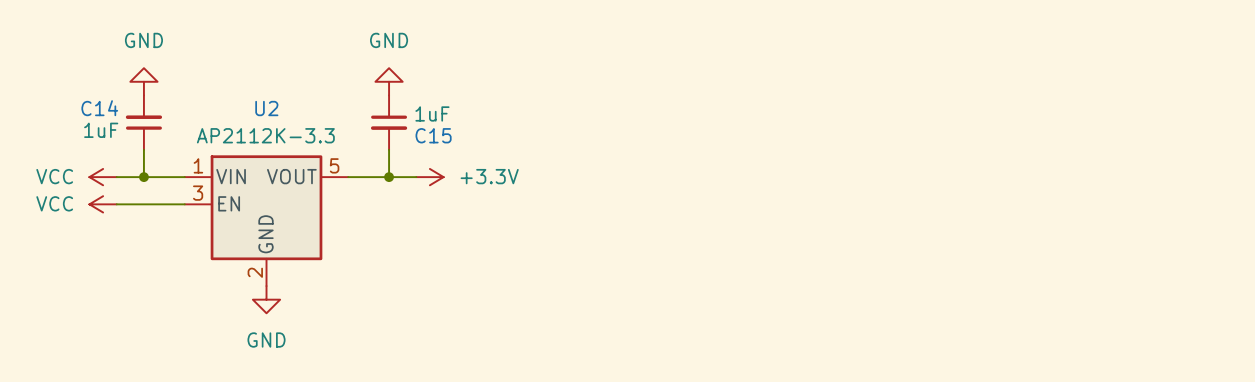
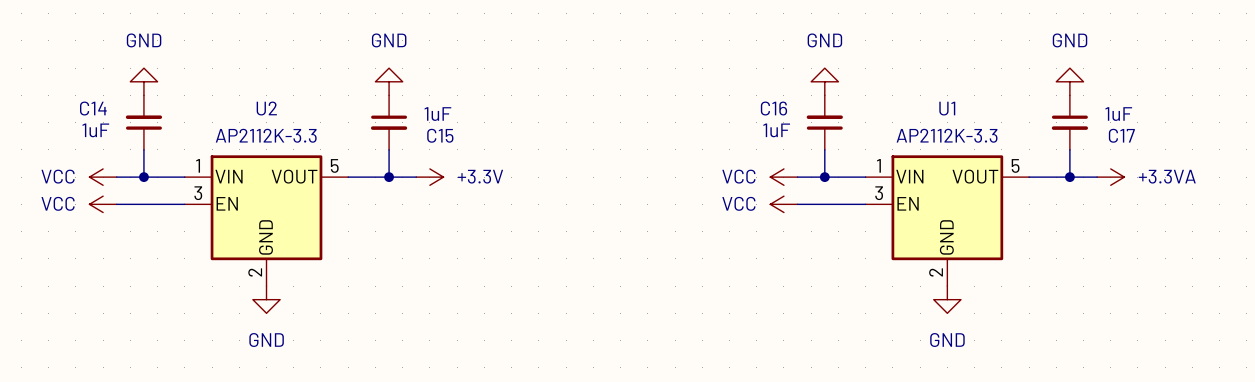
power symbol: none -> GND (824, 81)
power symbol: none -> GND (1069, 81)
C16: none -> 1uF (824, 122)
C17: none -> 1uF (1069, 122)
wire: none -> (824, 149) (824, 177)
wire: none -> (1069, 149) (1069, 177)
power symbol: none -> VCC (783, 177)
wire: none -> (797, 177) (865, 177)
junction: none -> (824, 177)
wire: none -> (1029, 177) (1097, 177)
junction: none -> (1069, 177)
power symbol: none -> +3.3VA (1110, 177)
power symbol: none -> VCC (783, 204)
wire: none -> (797, 204) (865, 204)
U1: none -> AP2112K-3.3 (947, 220)
power symbol: none -> GND (947, 299)

